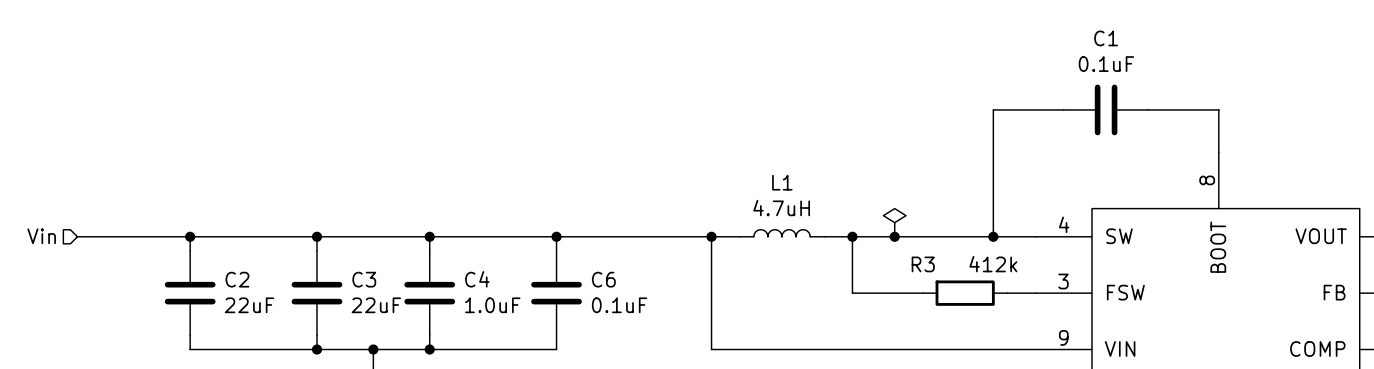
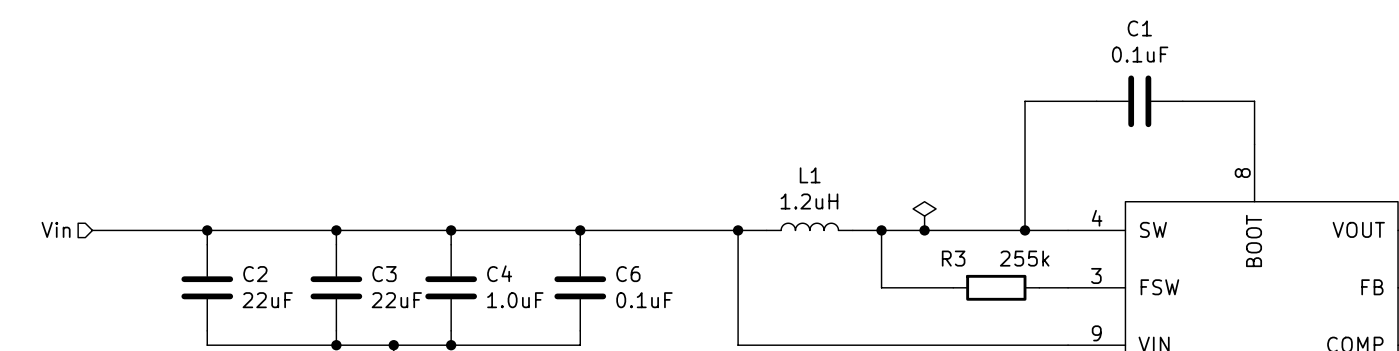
L1 value: 4.7uH (781, 208) -> 1.2uH (809, 201)
R3 value: 412k (993, 264) -> 255k (1024, 258)

